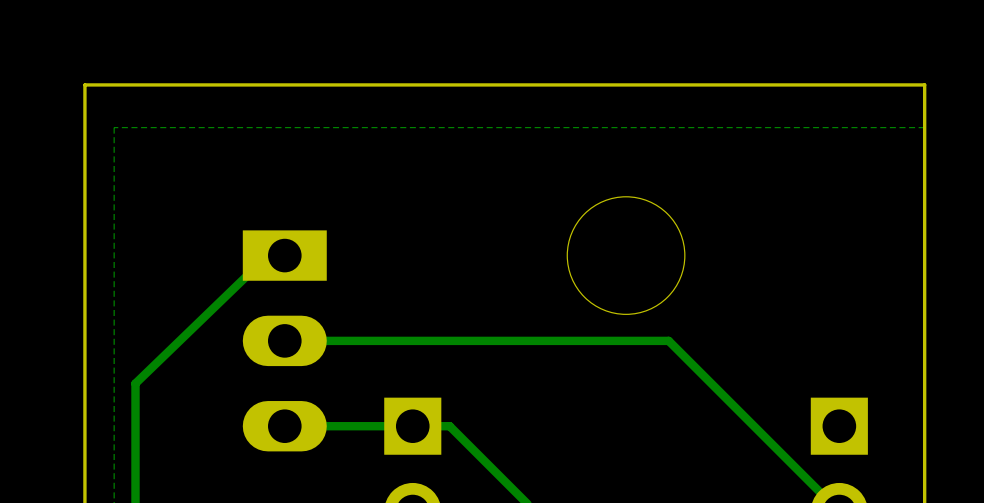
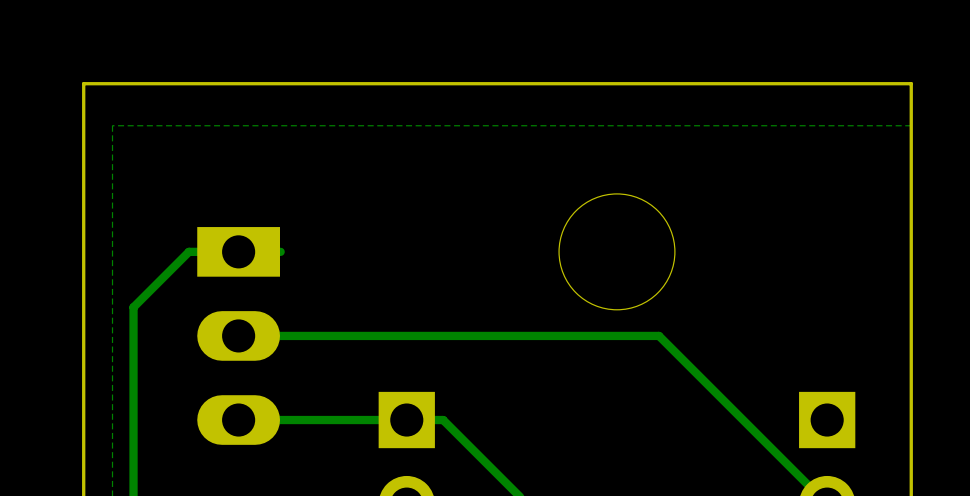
track: (268, 255) (135, 383) -> (238, 251) (188, 251) (133, 307) (133, 377)
part position: (284, 340) -> (238, 335)

